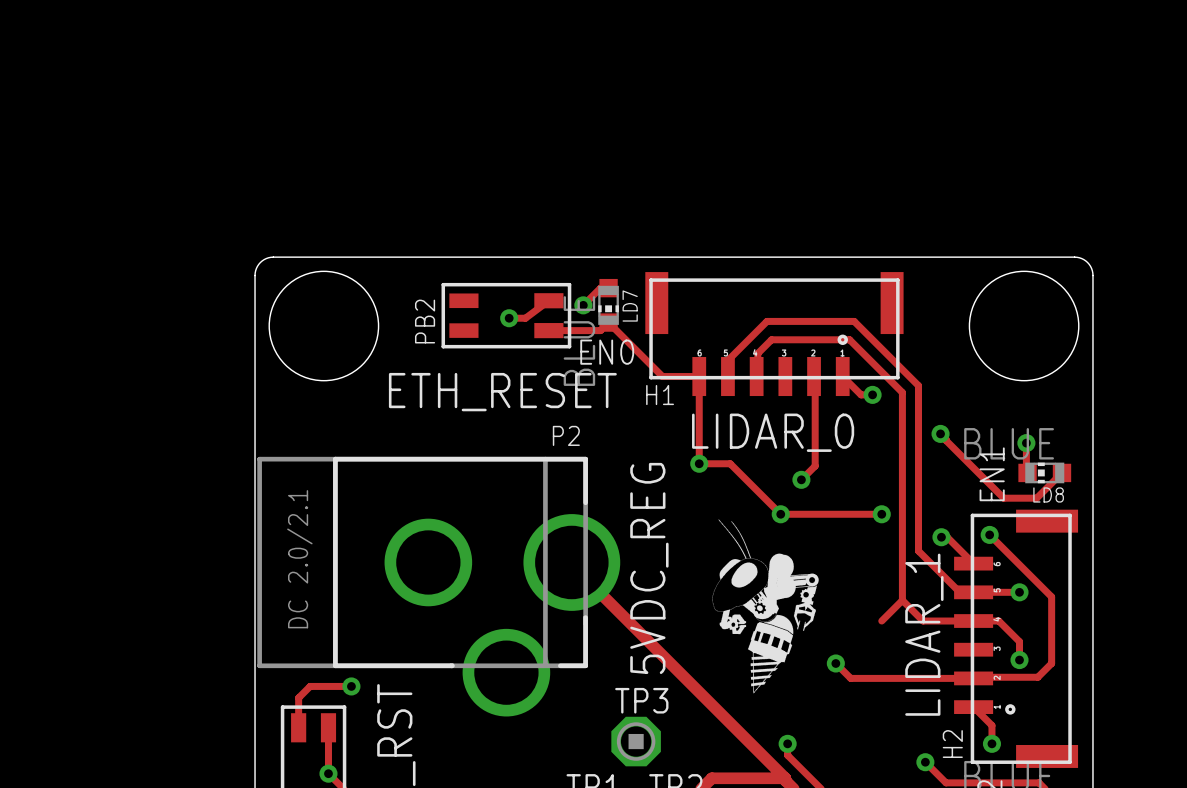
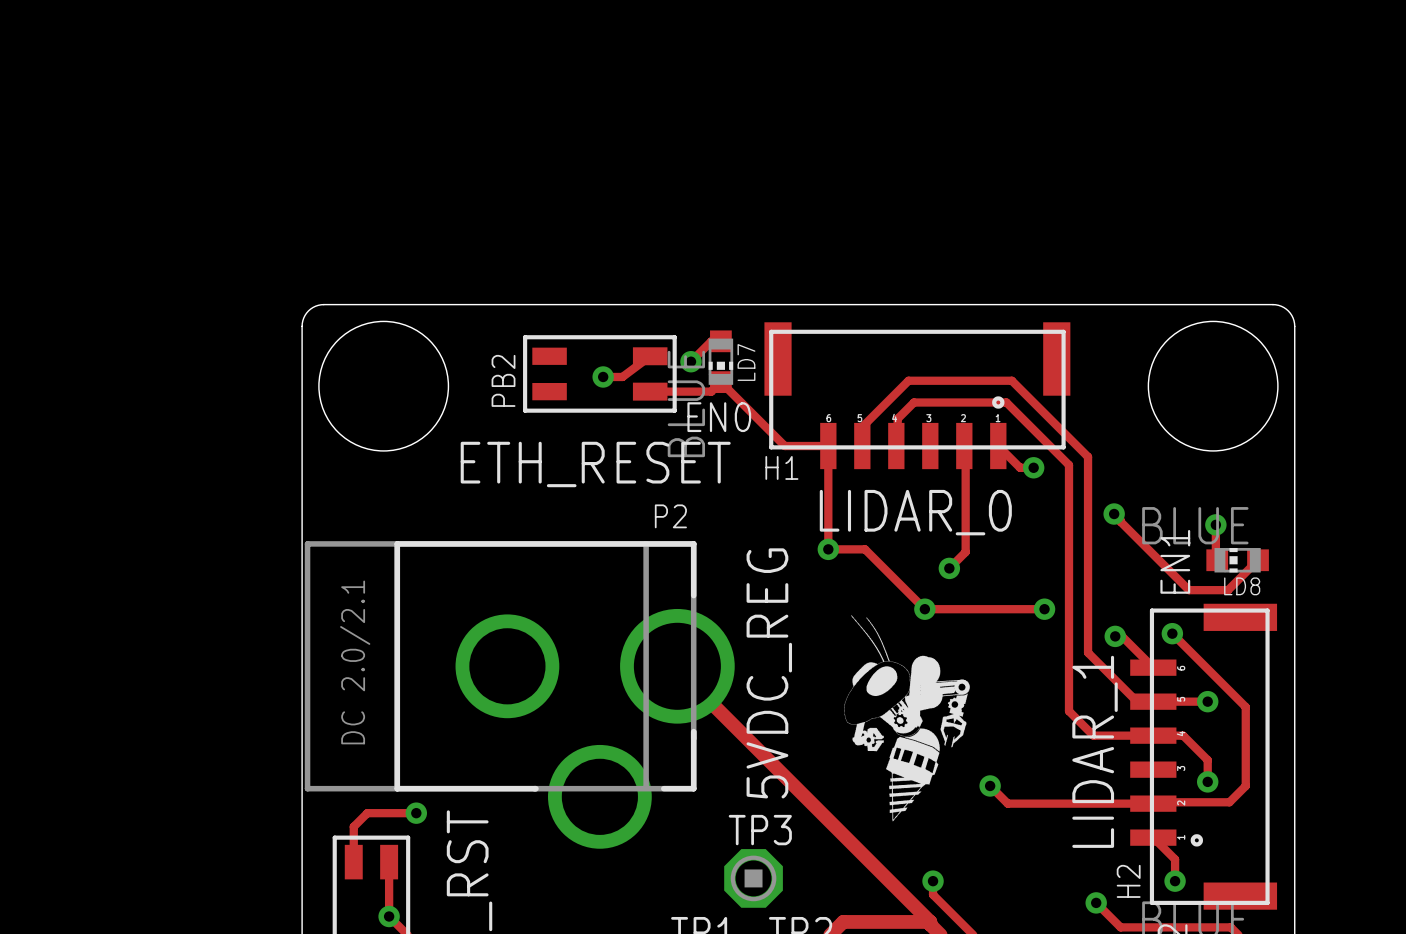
track: (902, 600) (881, 621) -> none

